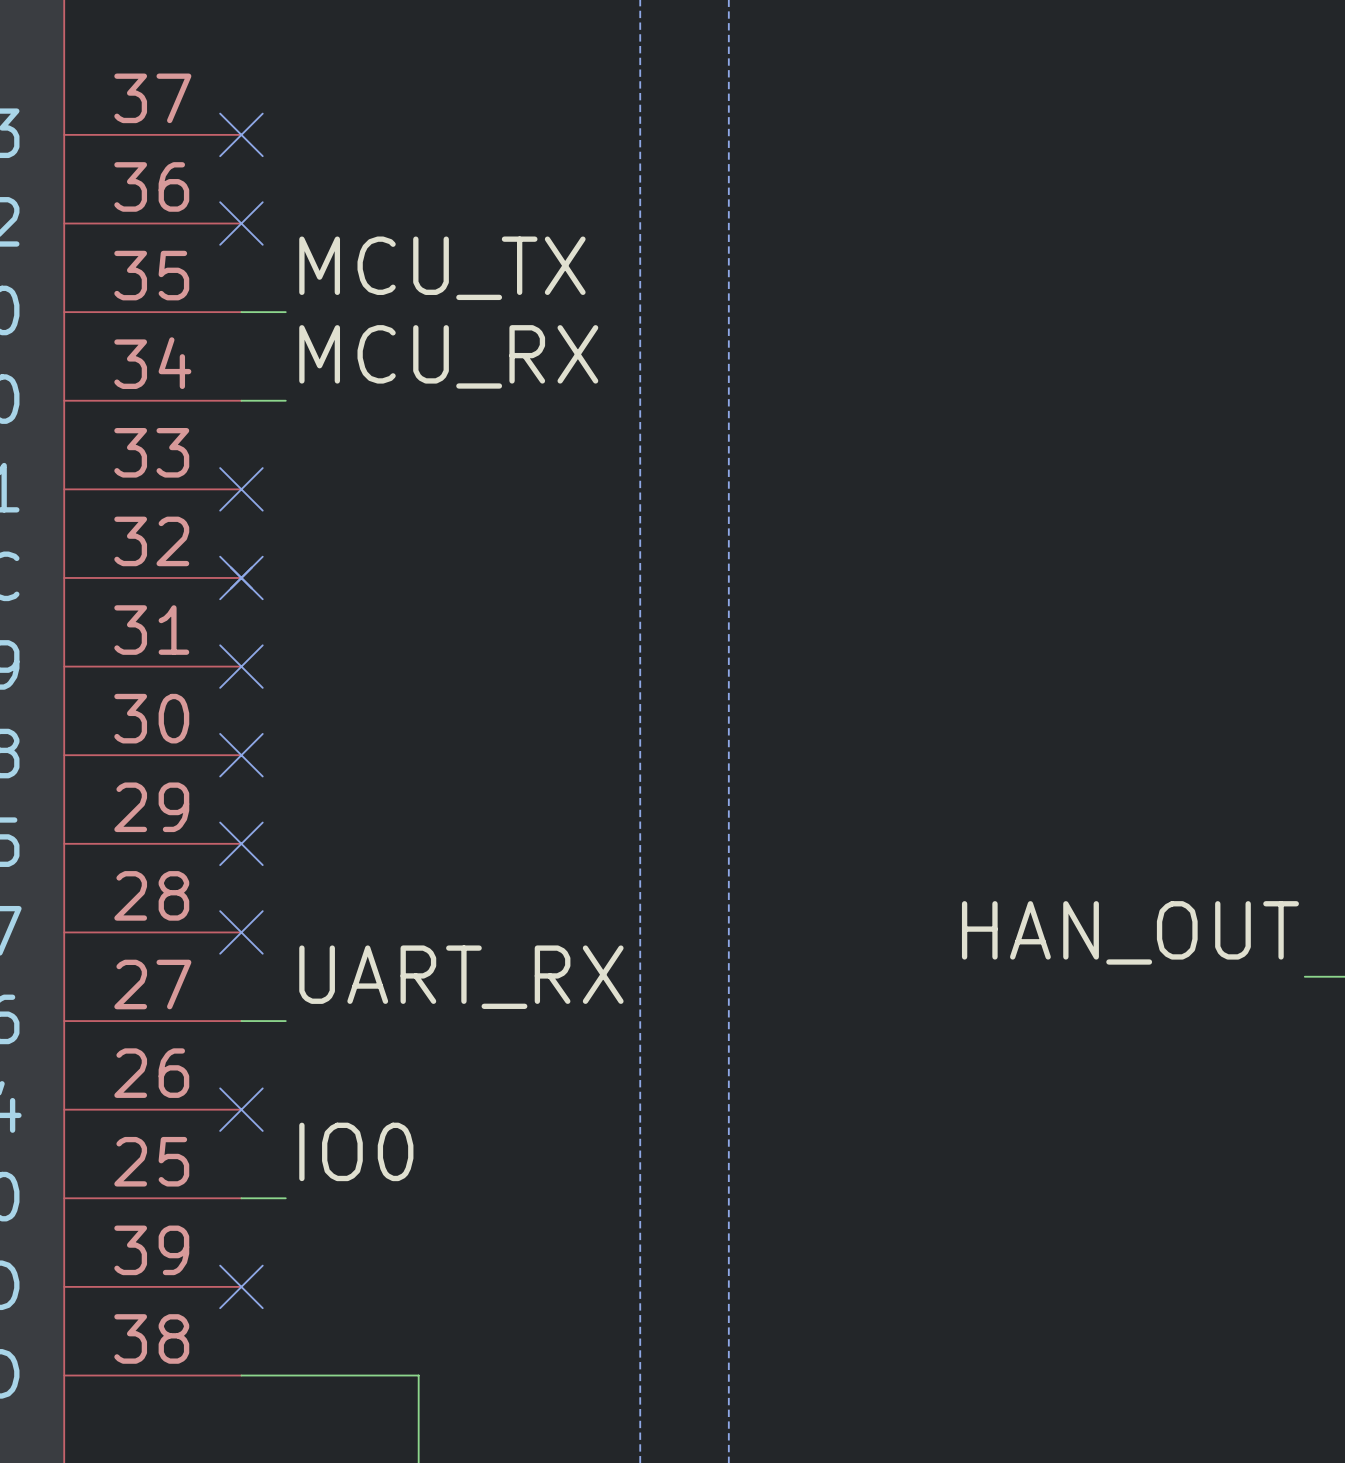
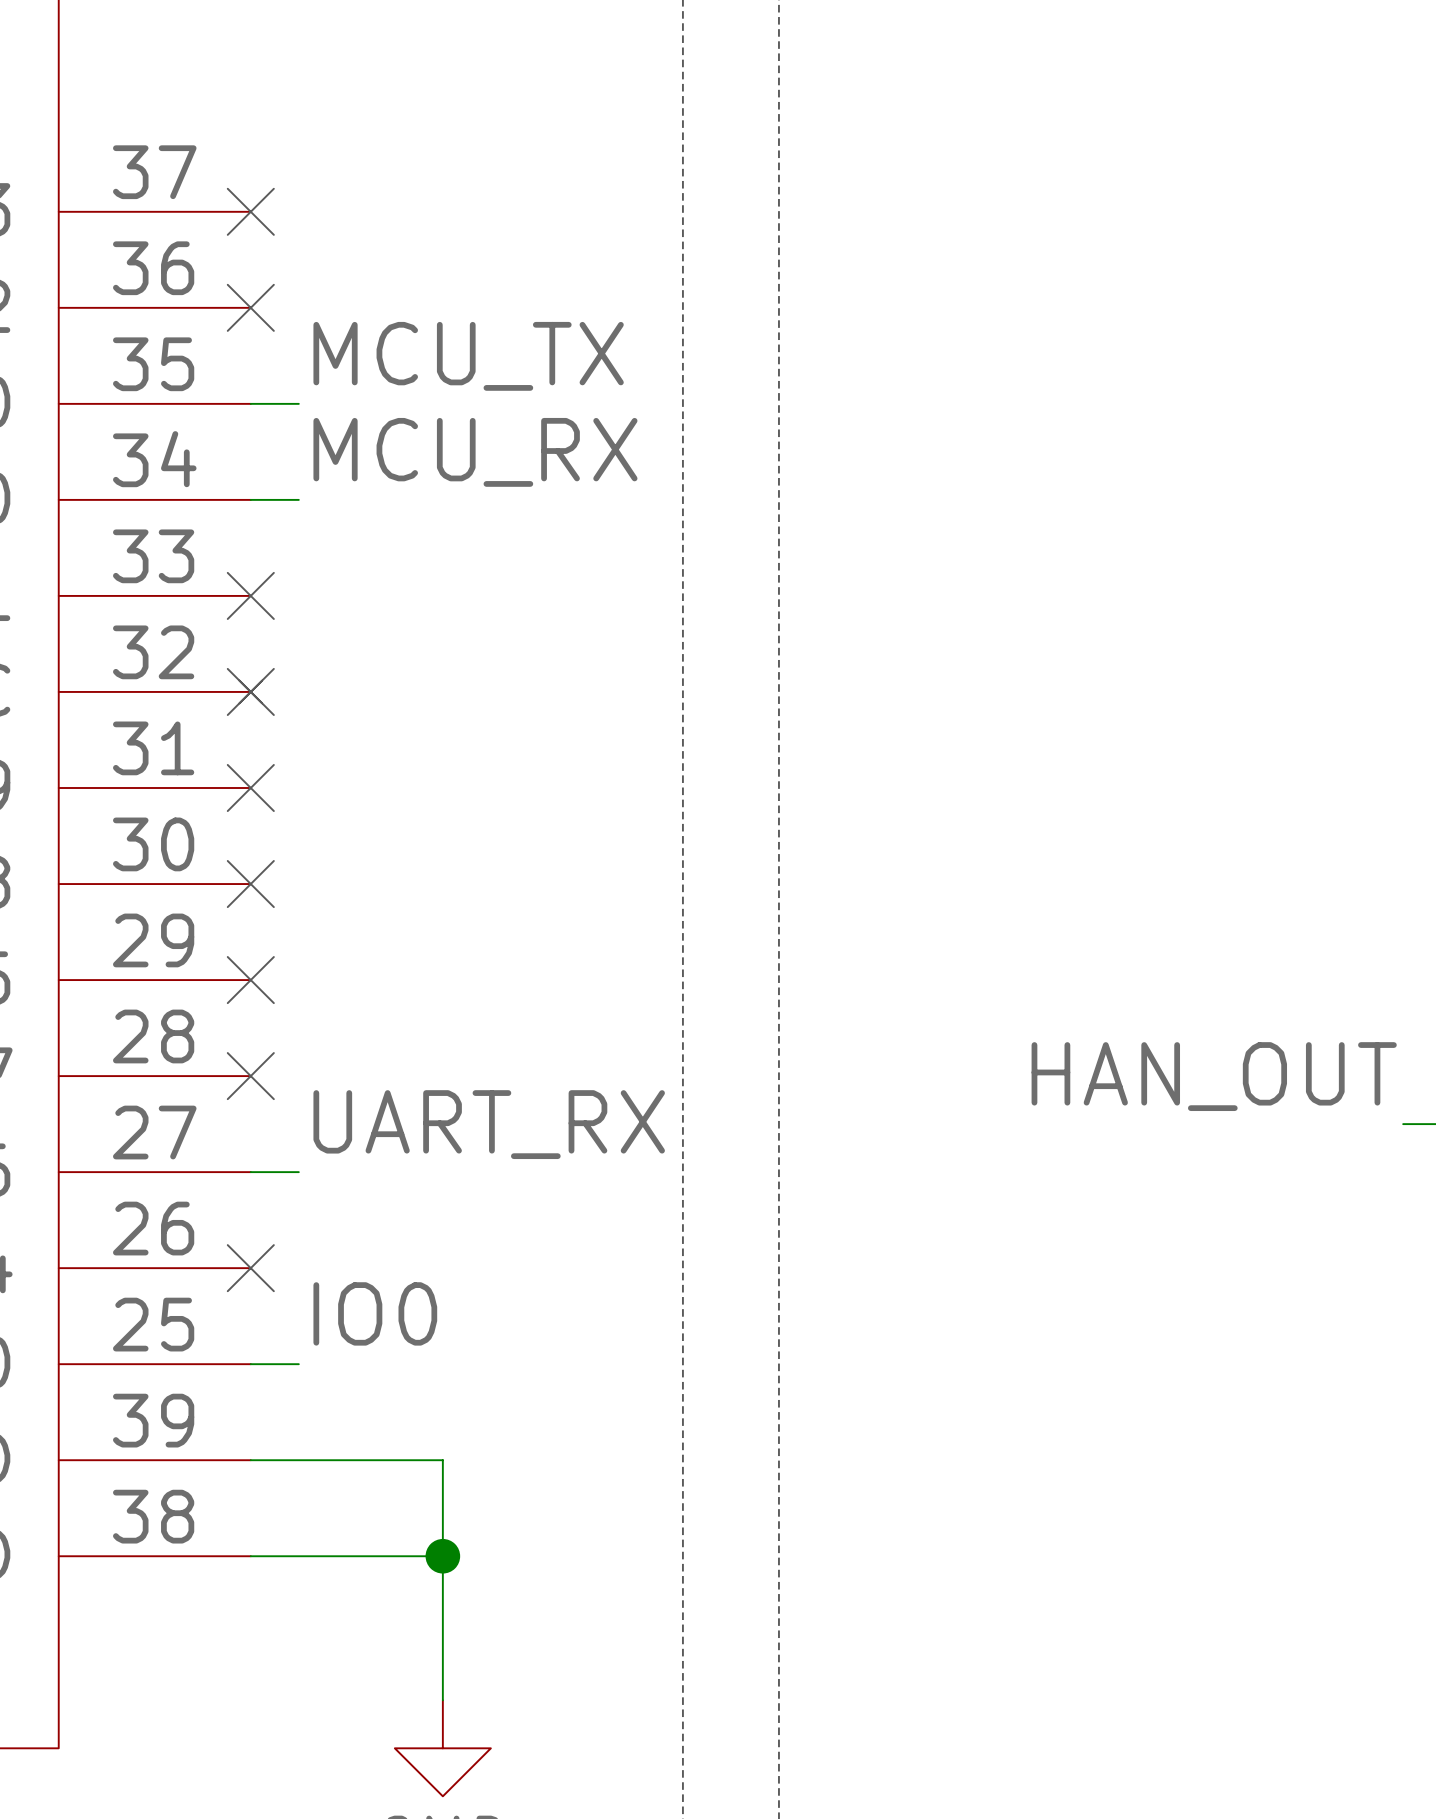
wire: none -> (250, 1460) (442, 1460) (442, 1556)
no-connect mark: (241, 1286) -> none
junction: none -> (442, 1556)

